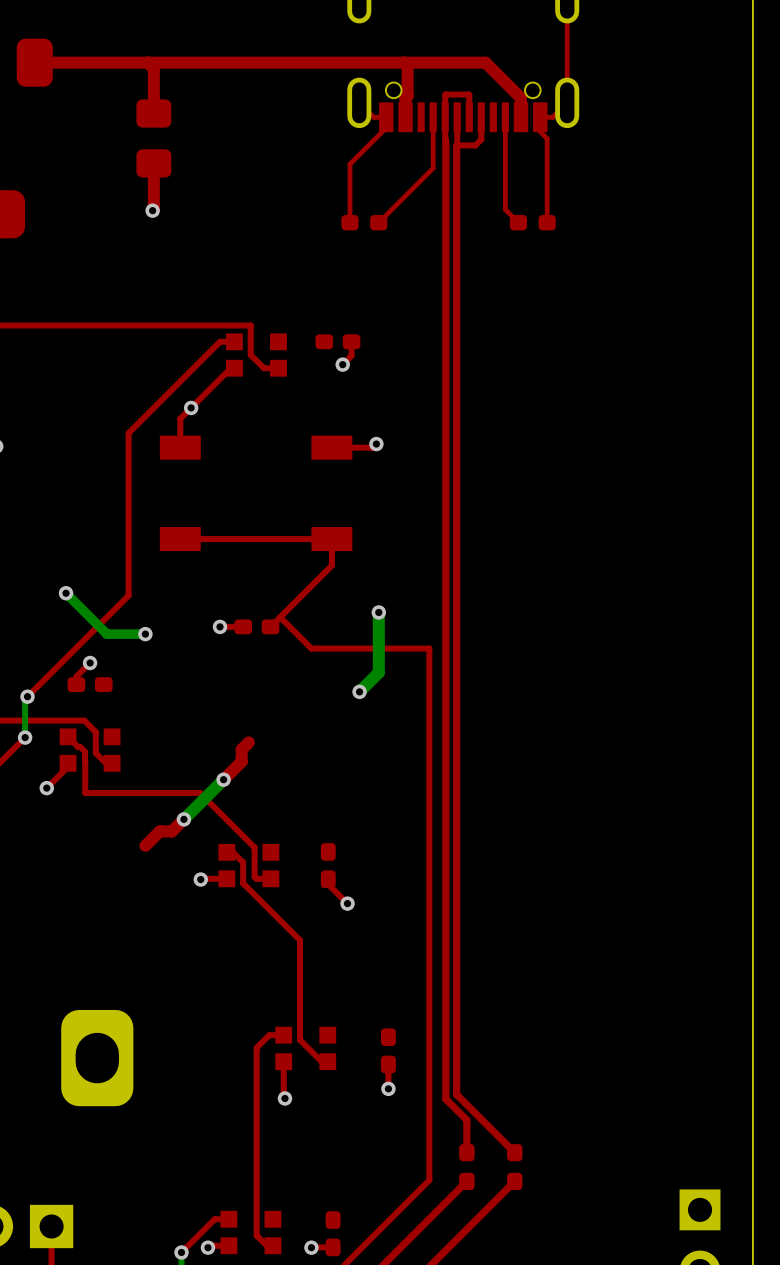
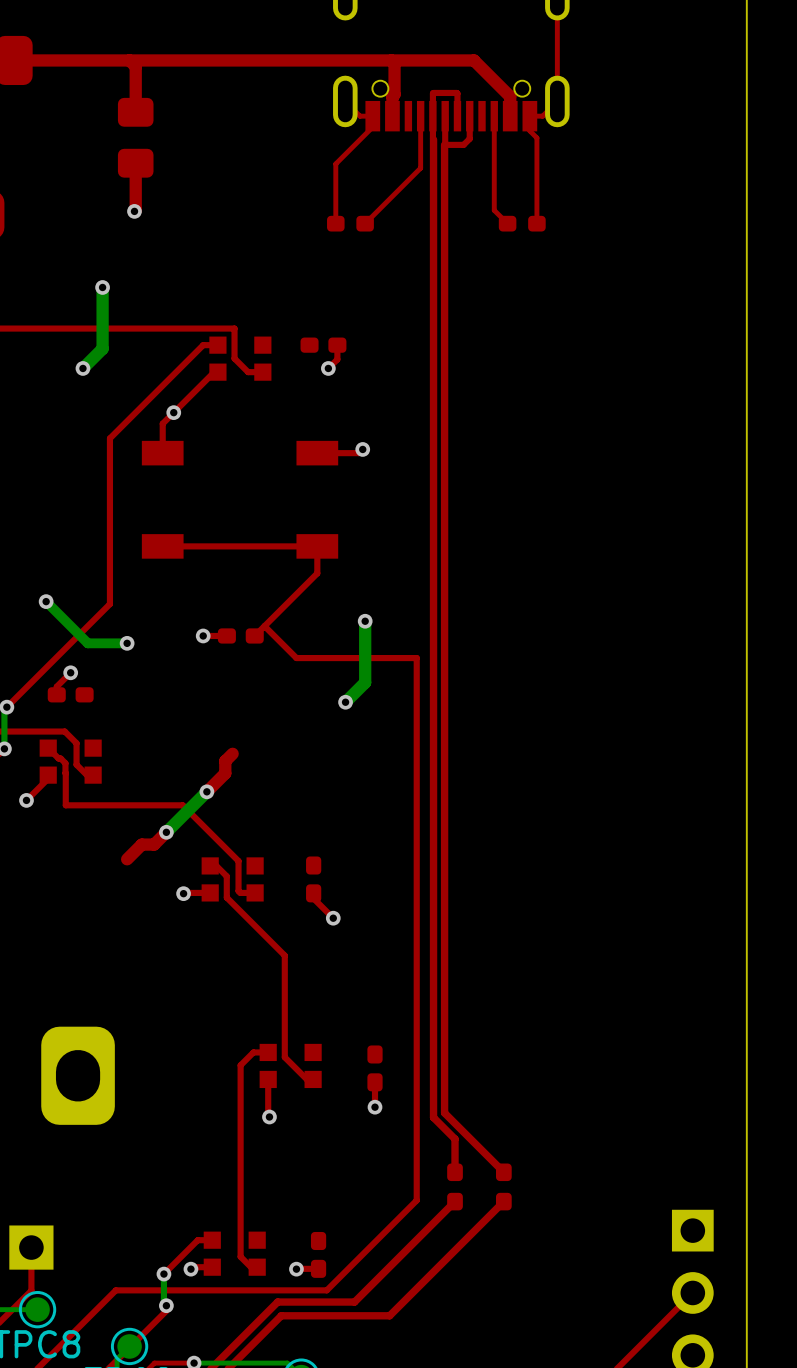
bottom track: none -> (102, 287) (102, 348) (82, 368)
via: none -> (102, 287)
via: none -> (82, 368)

